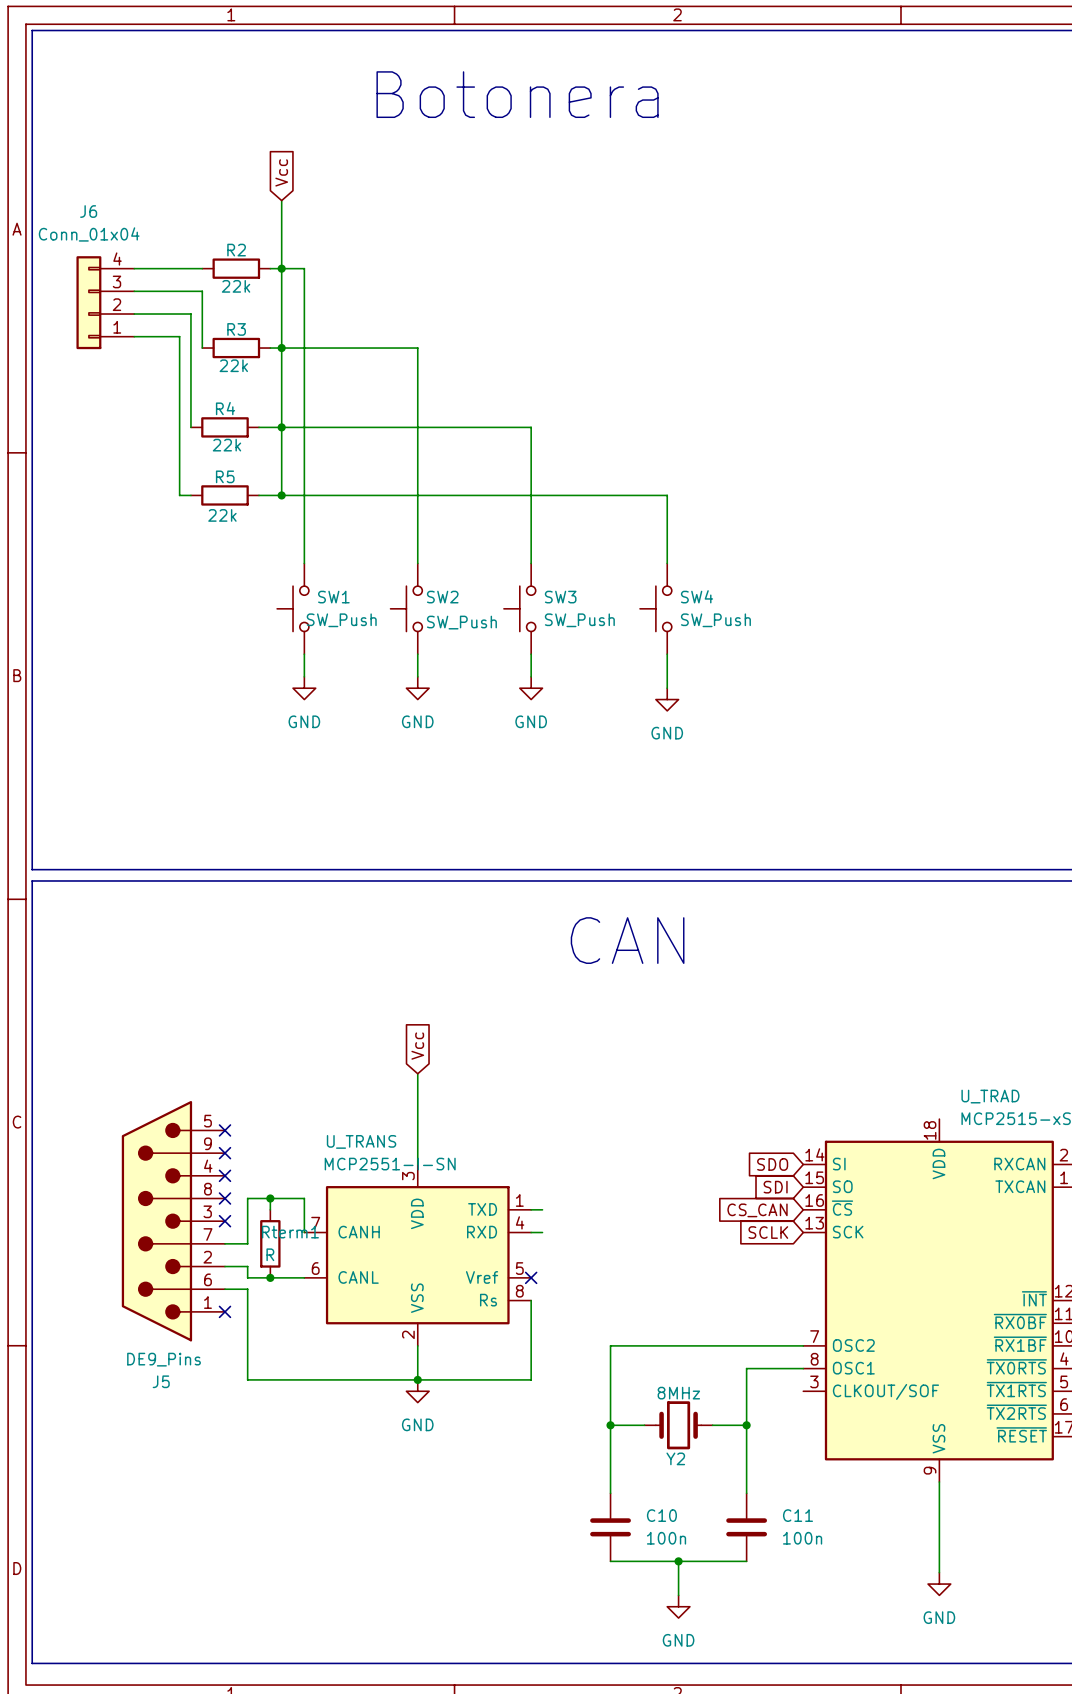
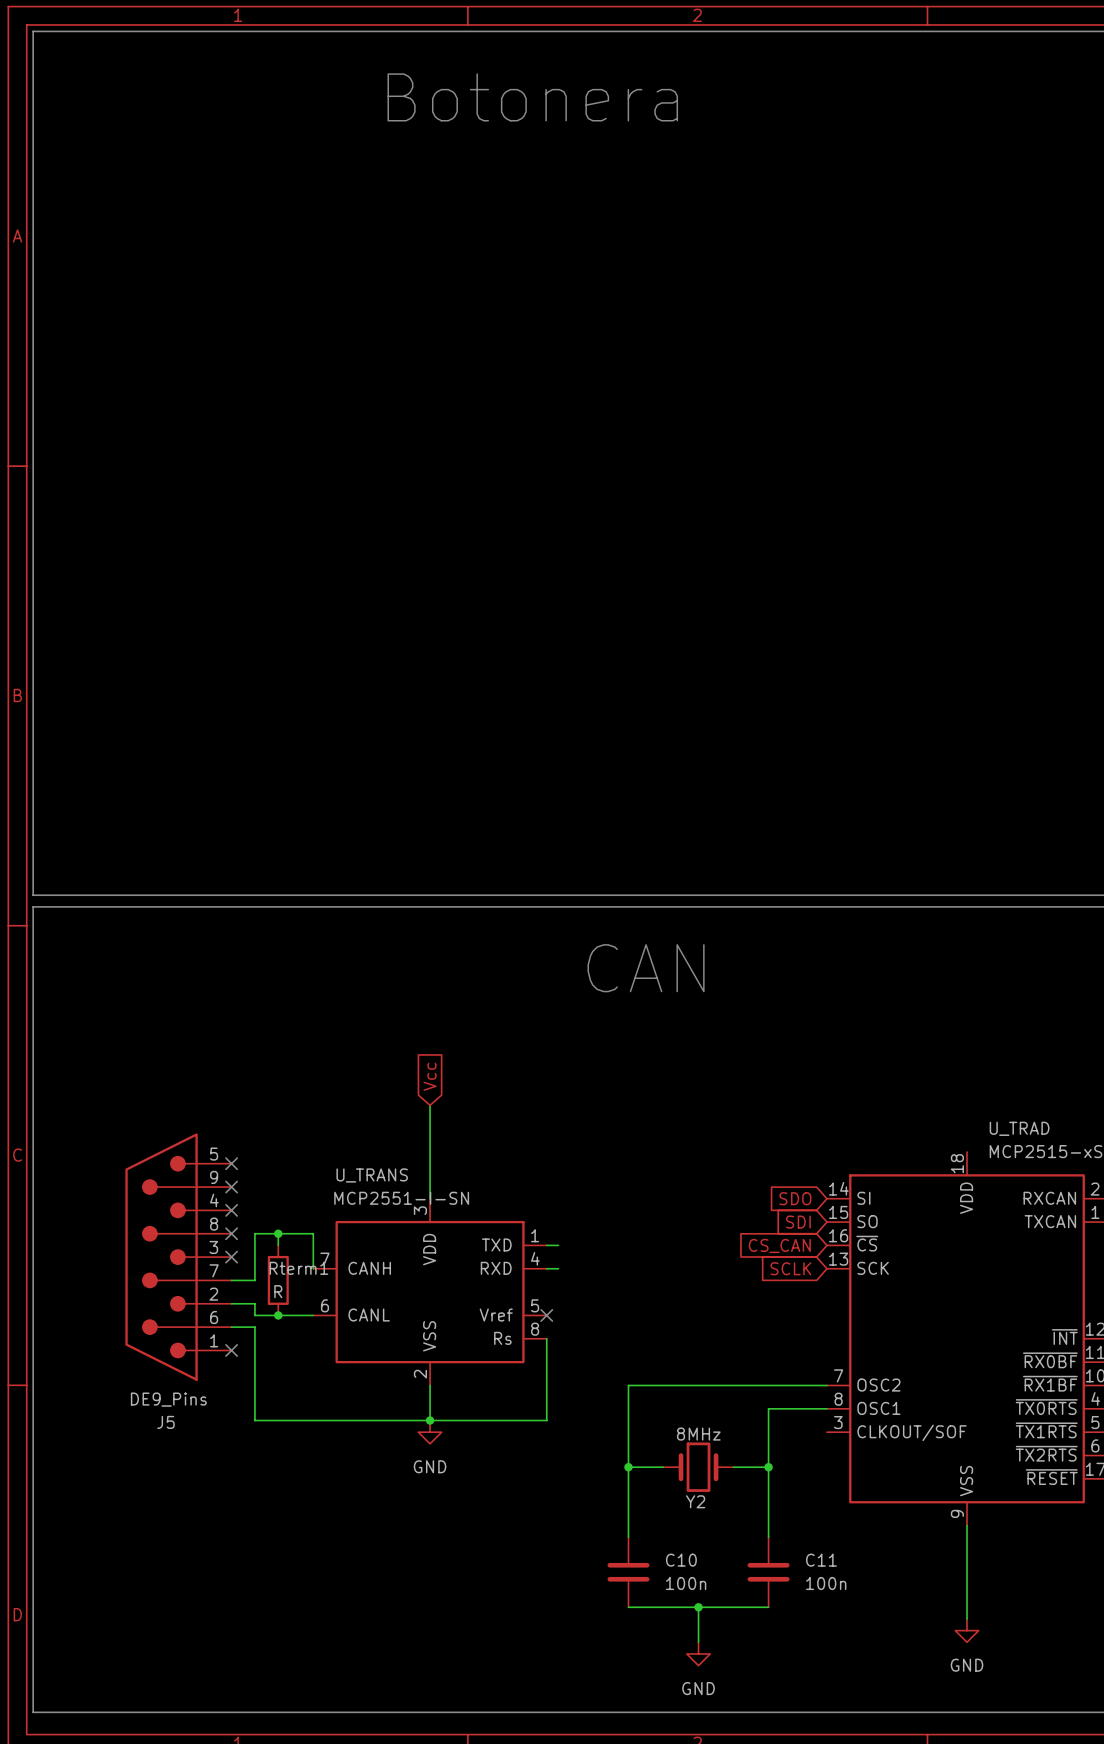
global label: Vcc (281, 172) -> none
wire: (281, 200) (281, 495) -> none
wire: (134, 268) (202, 268) -> none
R2: 22k (236, 268) -> none
wire: (270, 268) (304, 268) (304, 563) -> none
junction: (281, 268) -> none
wire: (134, 291) (202, 291) (202, 348) -> none
J6: Conn_01x04 (105, 302) -> none
wire: (134, 314) (190, 314) (190, 427) -> none
wire: (134, 336) (179, 336) (179, 495) (190, 495) -> none
R3: 22k (236, 348) -> none
wire: (270, 348) (417, 348) (417, 563) -> none
junction: (281, 348) -> none
R4: 22k (224, 427) -> none
wire: (259, 427) (531, 427) (531, 563) -> none
junction: (281, 427) -> none
R5: 22k (224, 495) -> none
wire: (259, 495) (667, 495) (667, 563) -> none
junction: (281, 495) -> none
SW1: SW_Push (293, 608) -> none
SW2: SW_Push (406, 608) -> none
SW3: SW_Push (519, 608) -> none
SW4: SW_Push (655, 608) -> none
wire: (304, 654) (304, 676) -> none
wire: (417, 654) (417, 676) -> none
wire: (531, 654) (531, 676) -> none
wire: (667, 654) (667, 688) -> none
power symbol: GND (304, 688) -> none
power symbol: GND (417, 688) -> none
power symbol: GND (531, 688) -> none
power symbol: GND (667, 699) -> none

